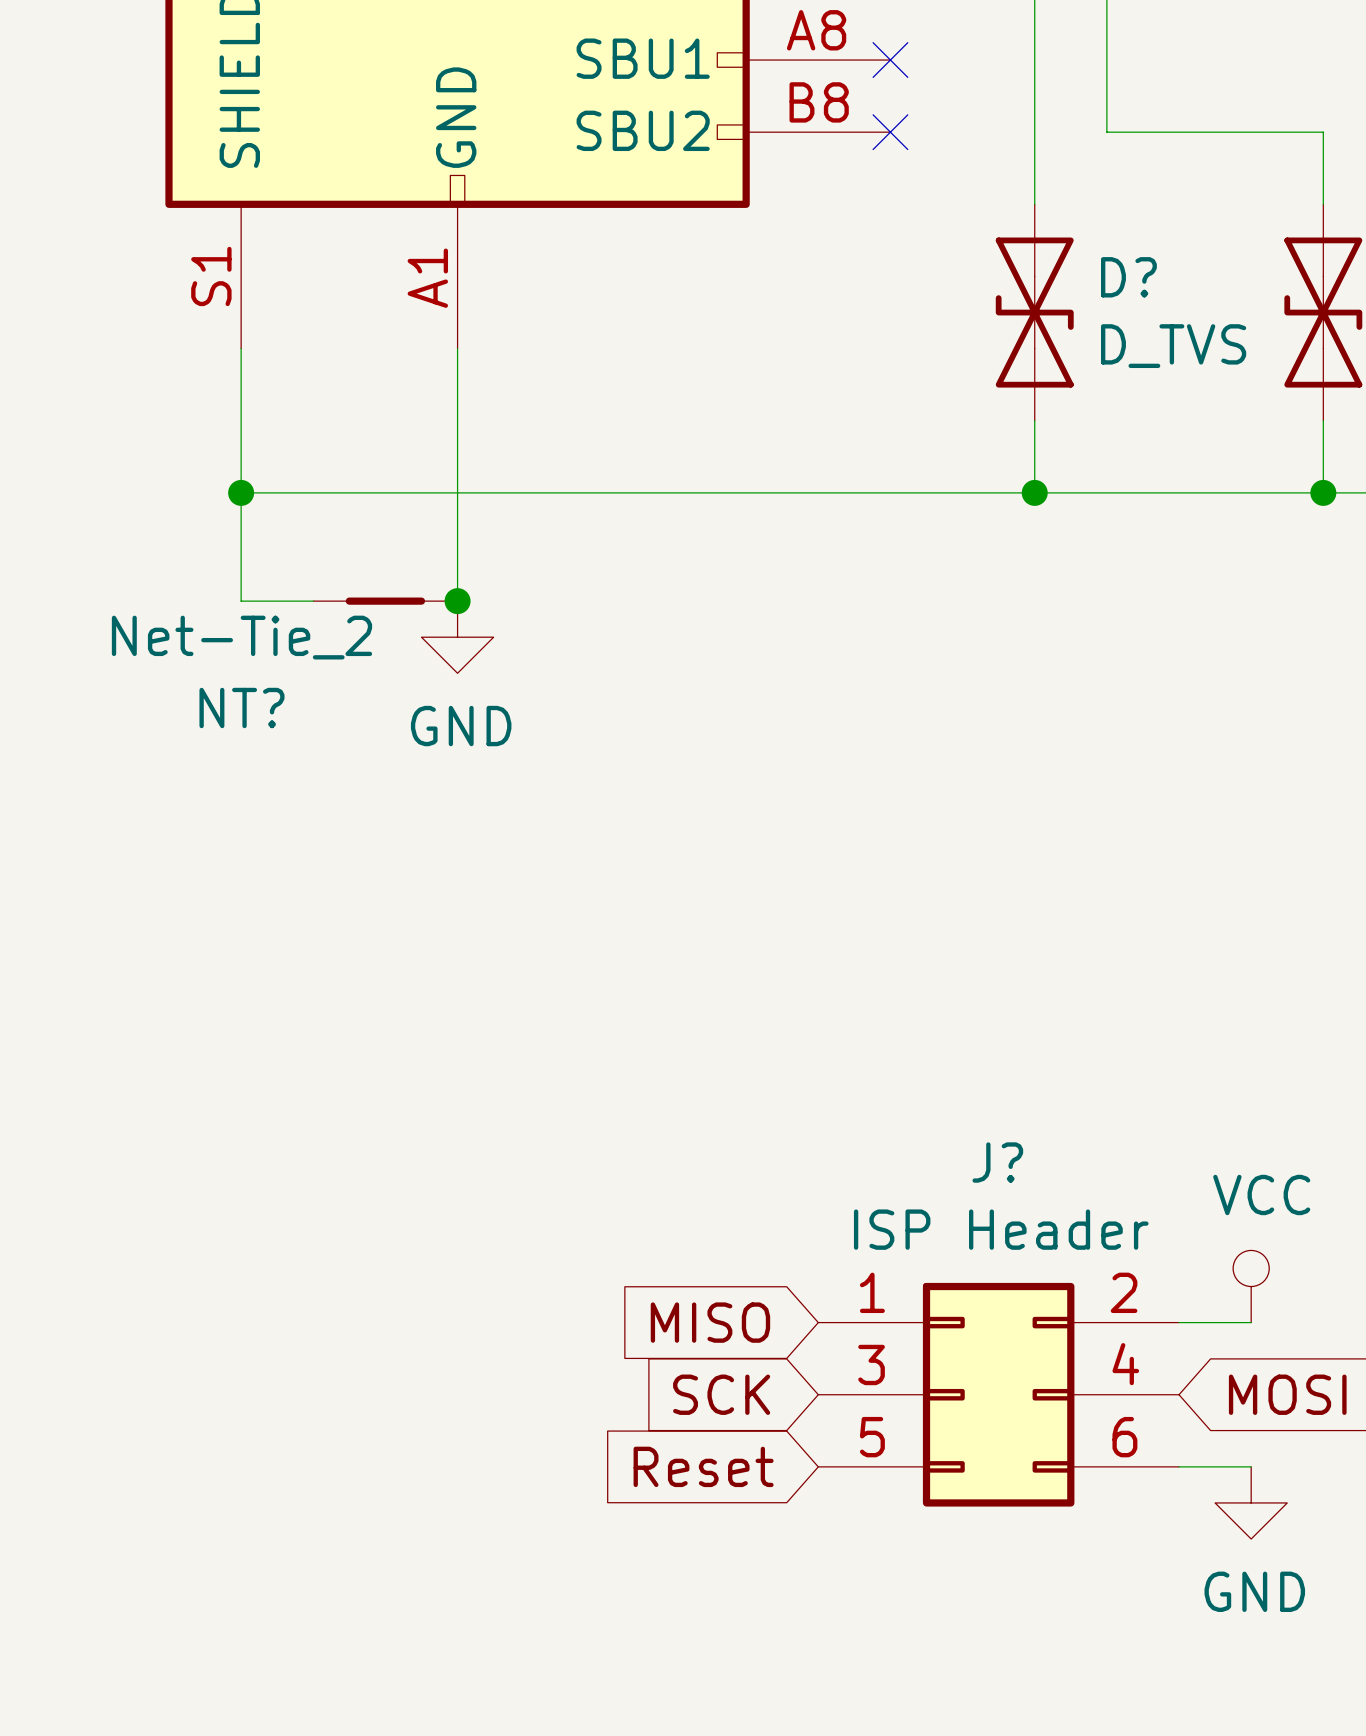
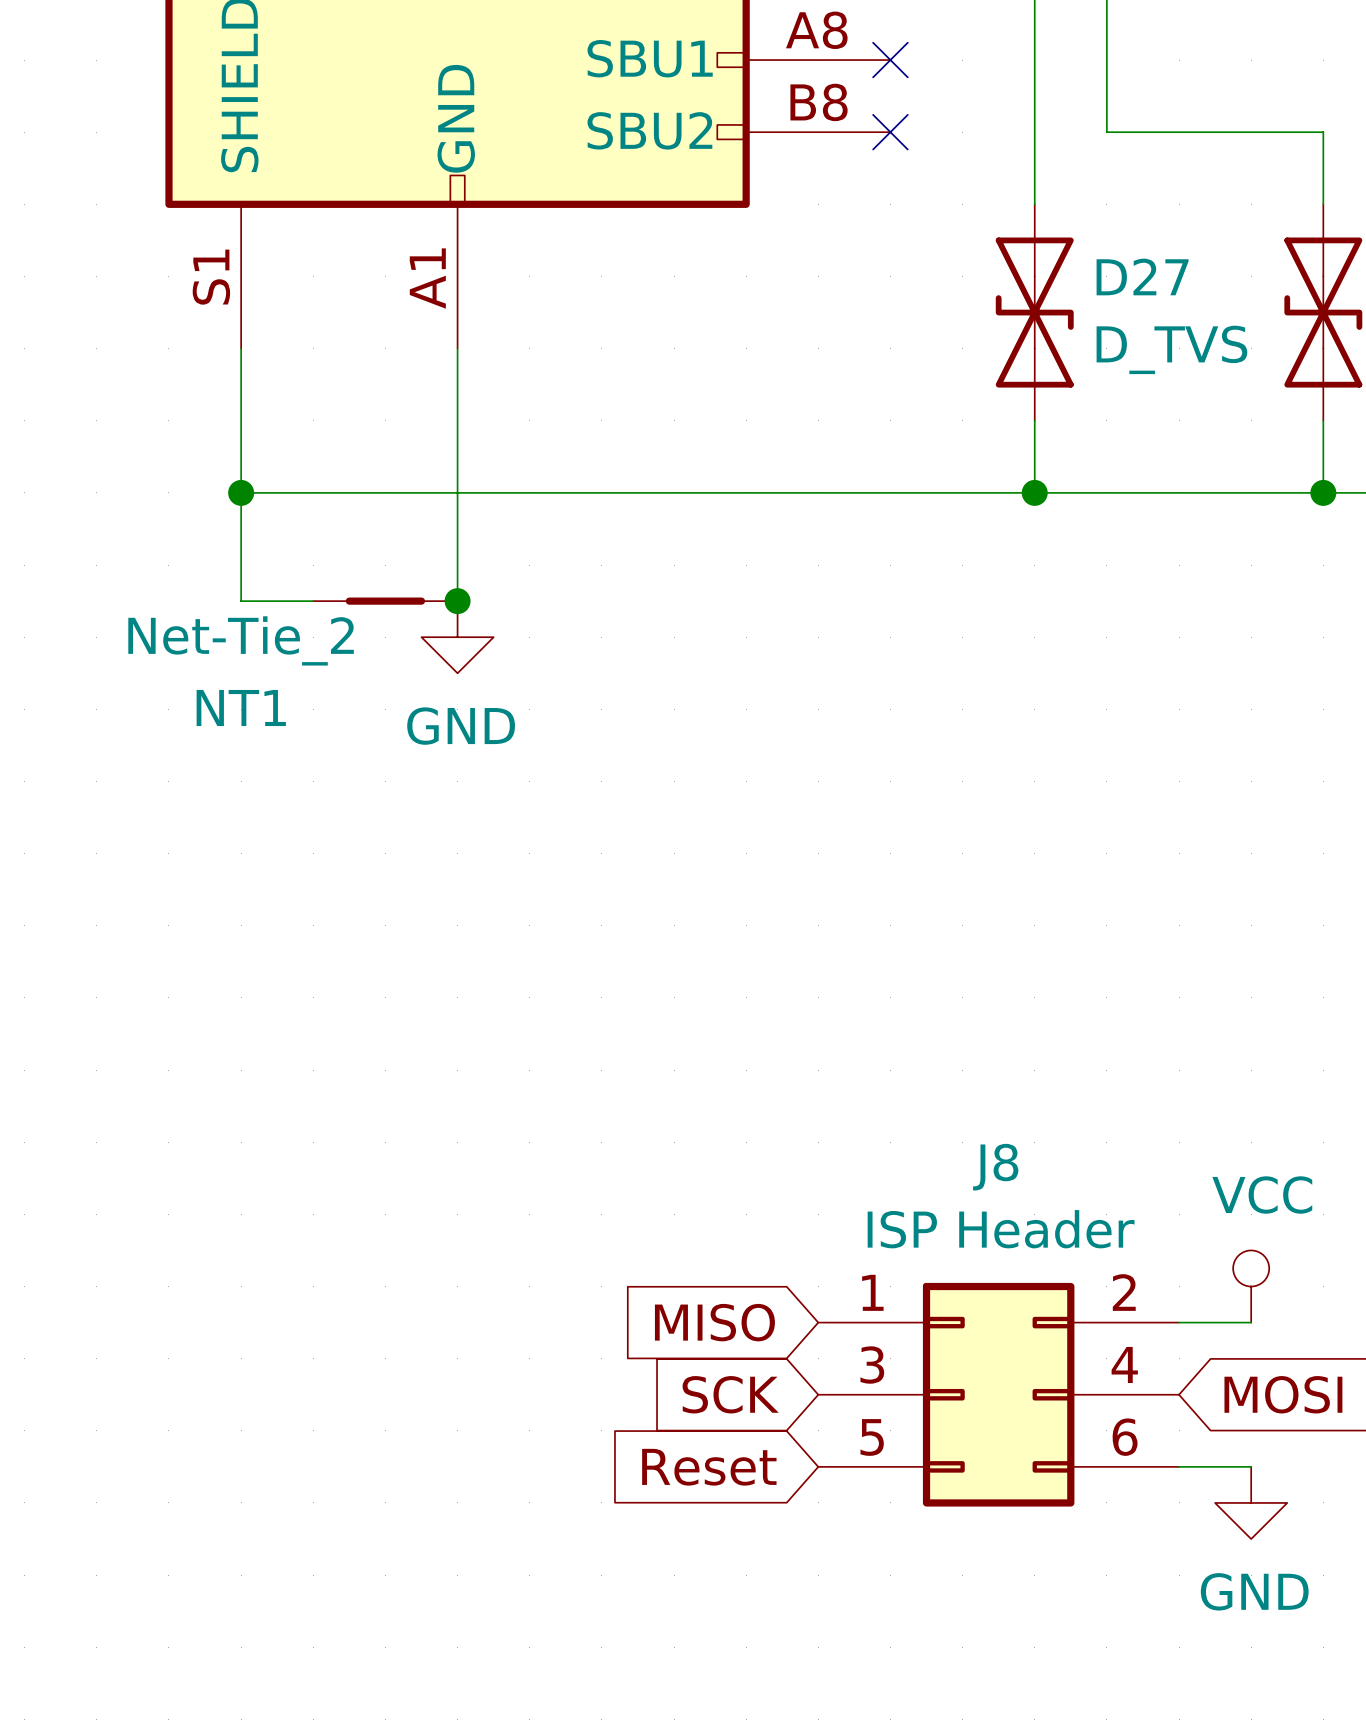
D? name: D? (1128, 277) -> D27 (1142, 276)
NT? name: NT? (241, 708) -> NT1 (241, 708)
J? name: J? (997, 1162) -> J8 (995, 1167)

